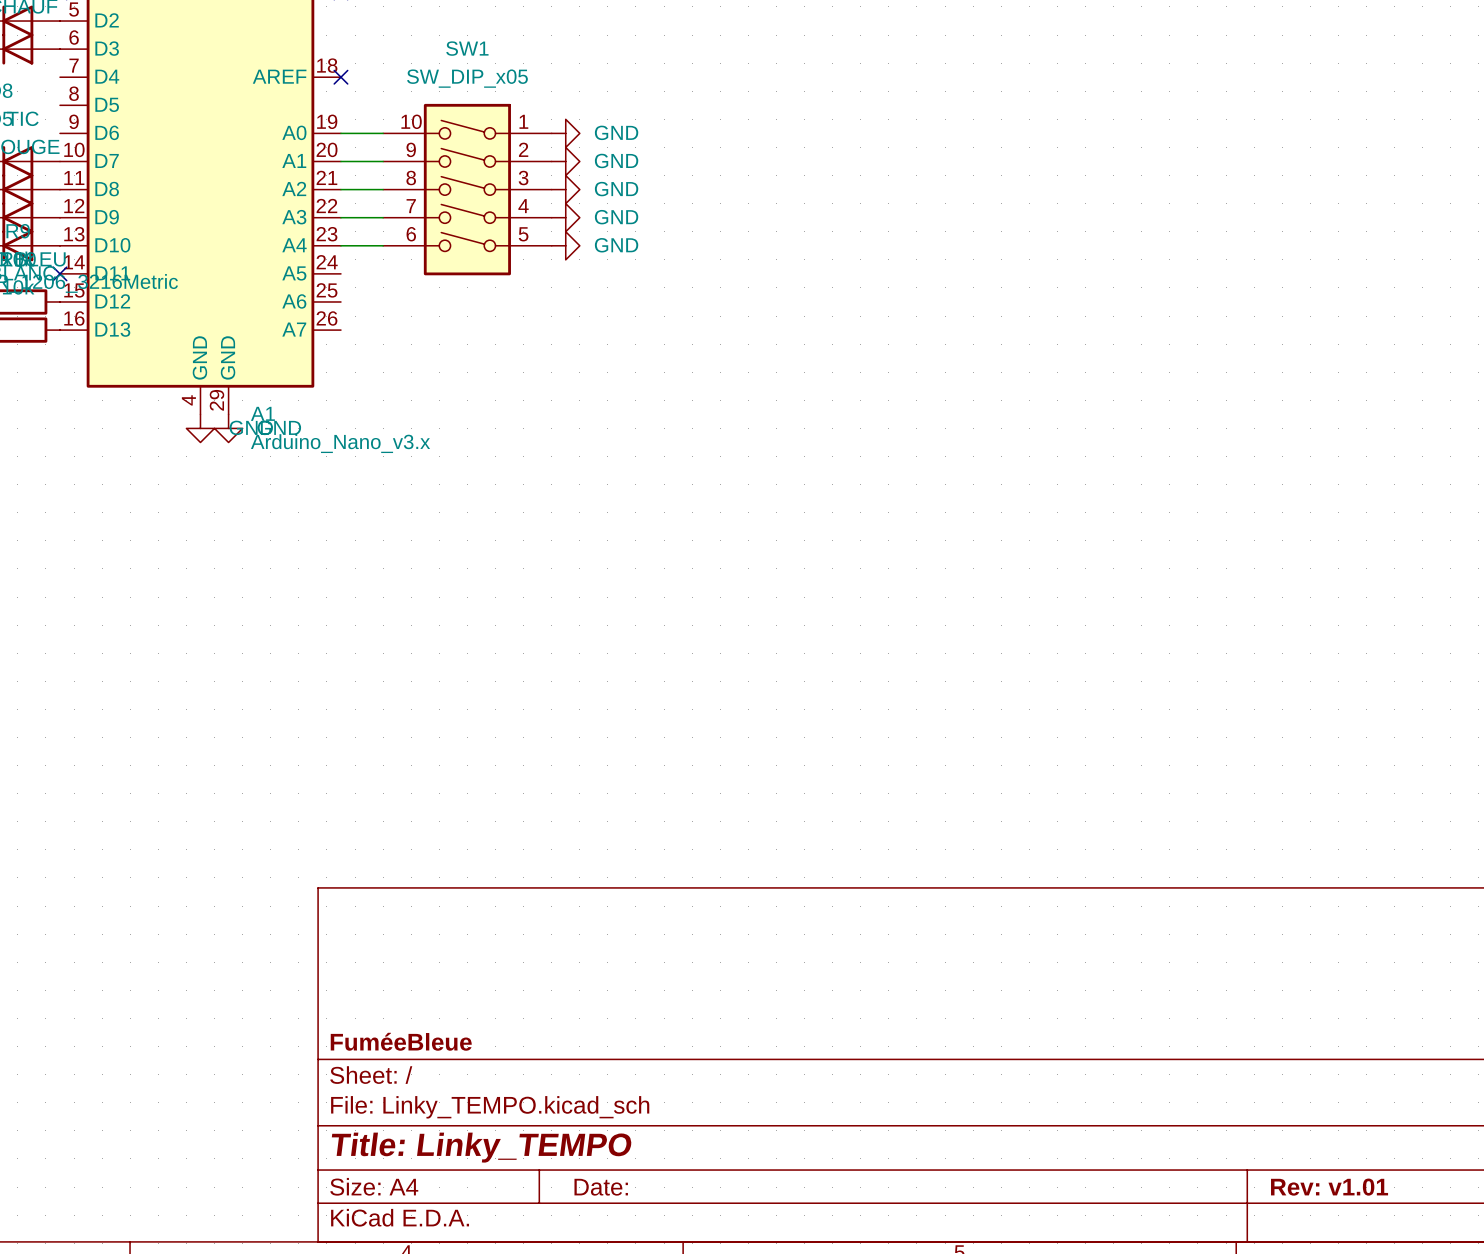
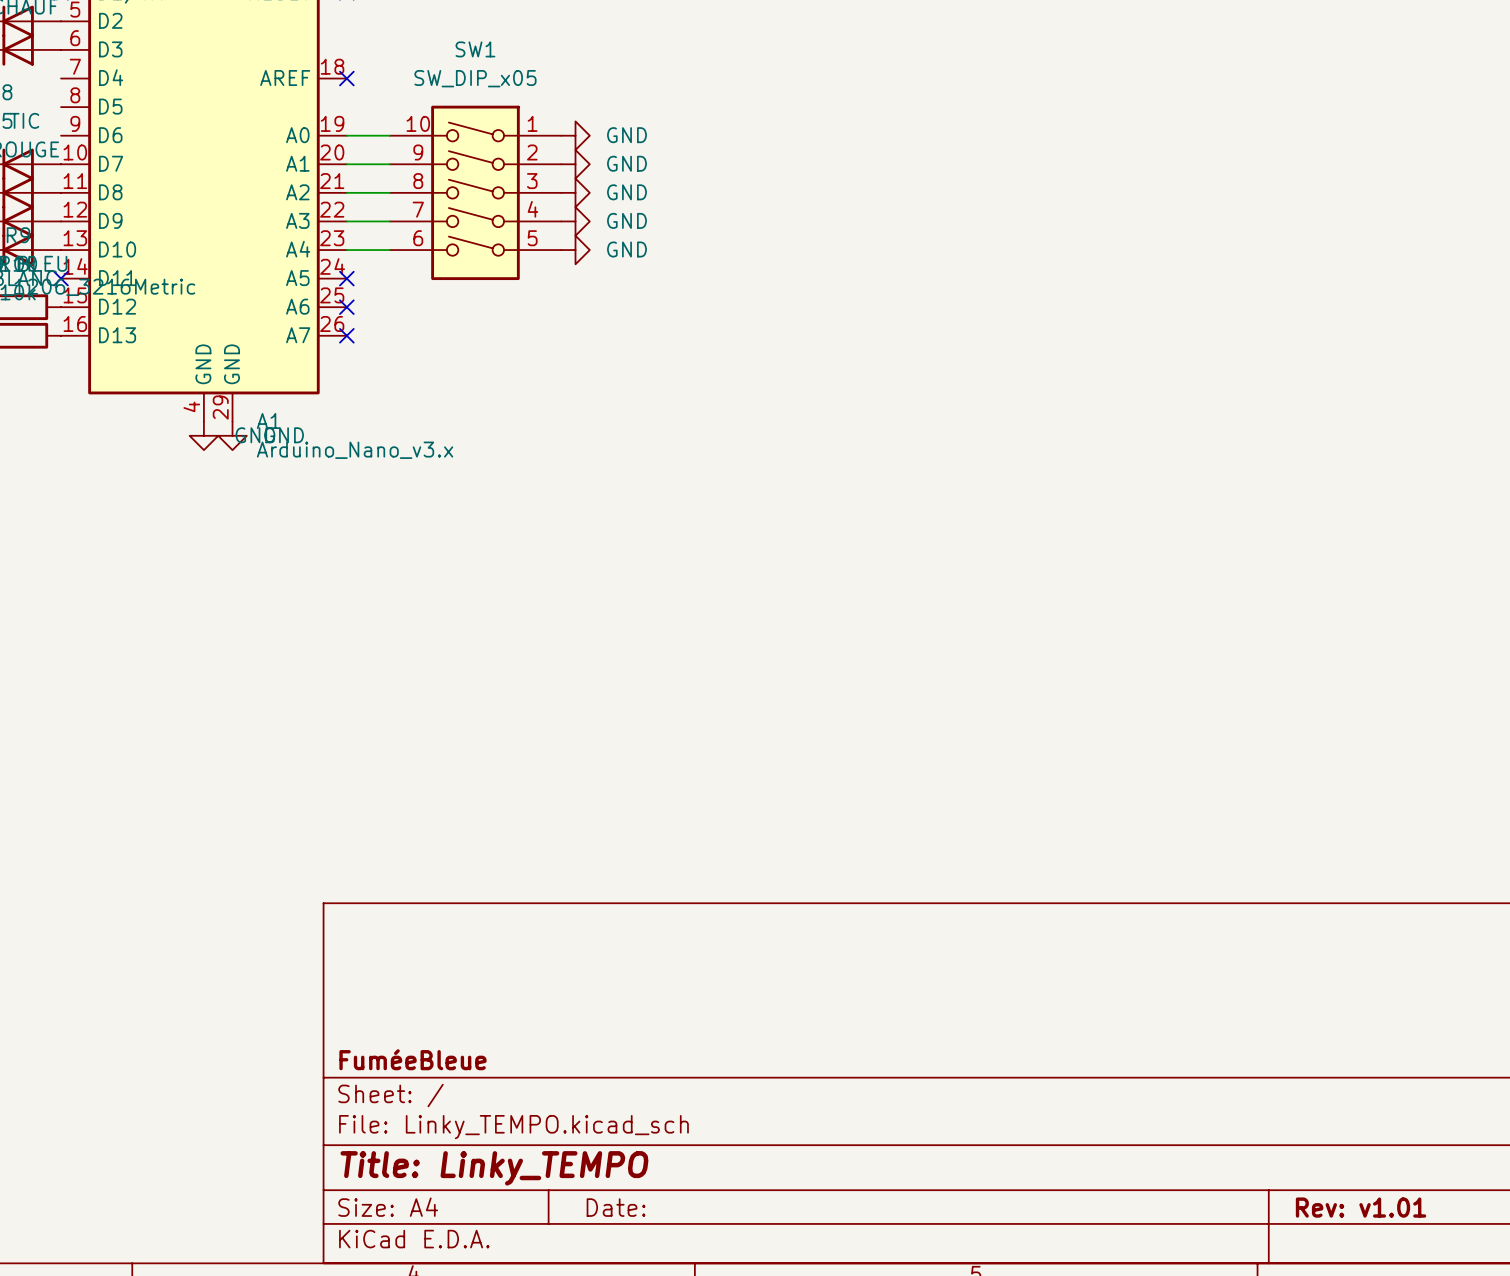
no-connect mark: none -> (346, 278)
no-connect mark: none -> (346, 307)
no-connect mark: none -> (346, 335)

